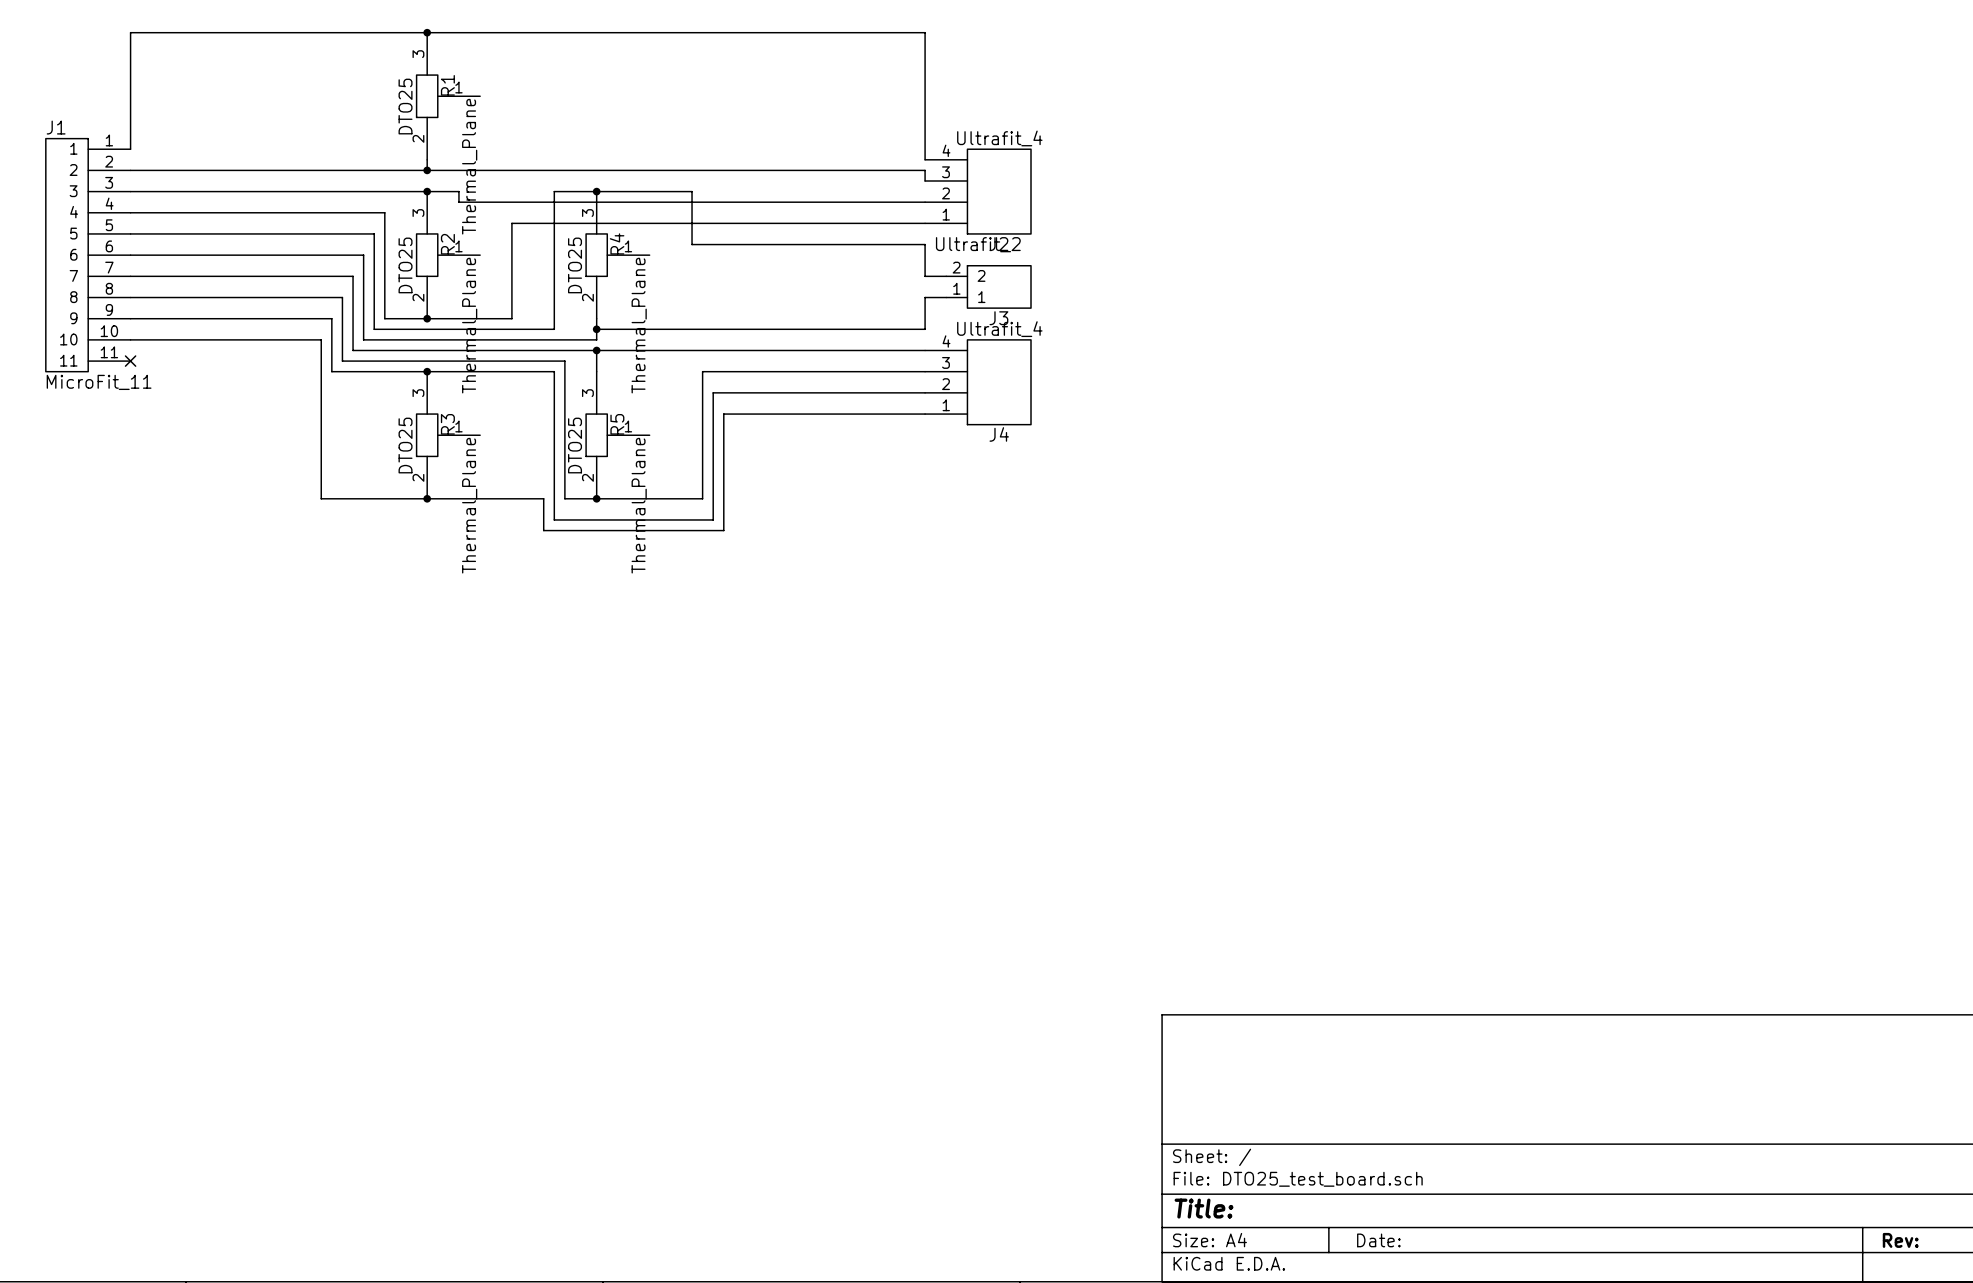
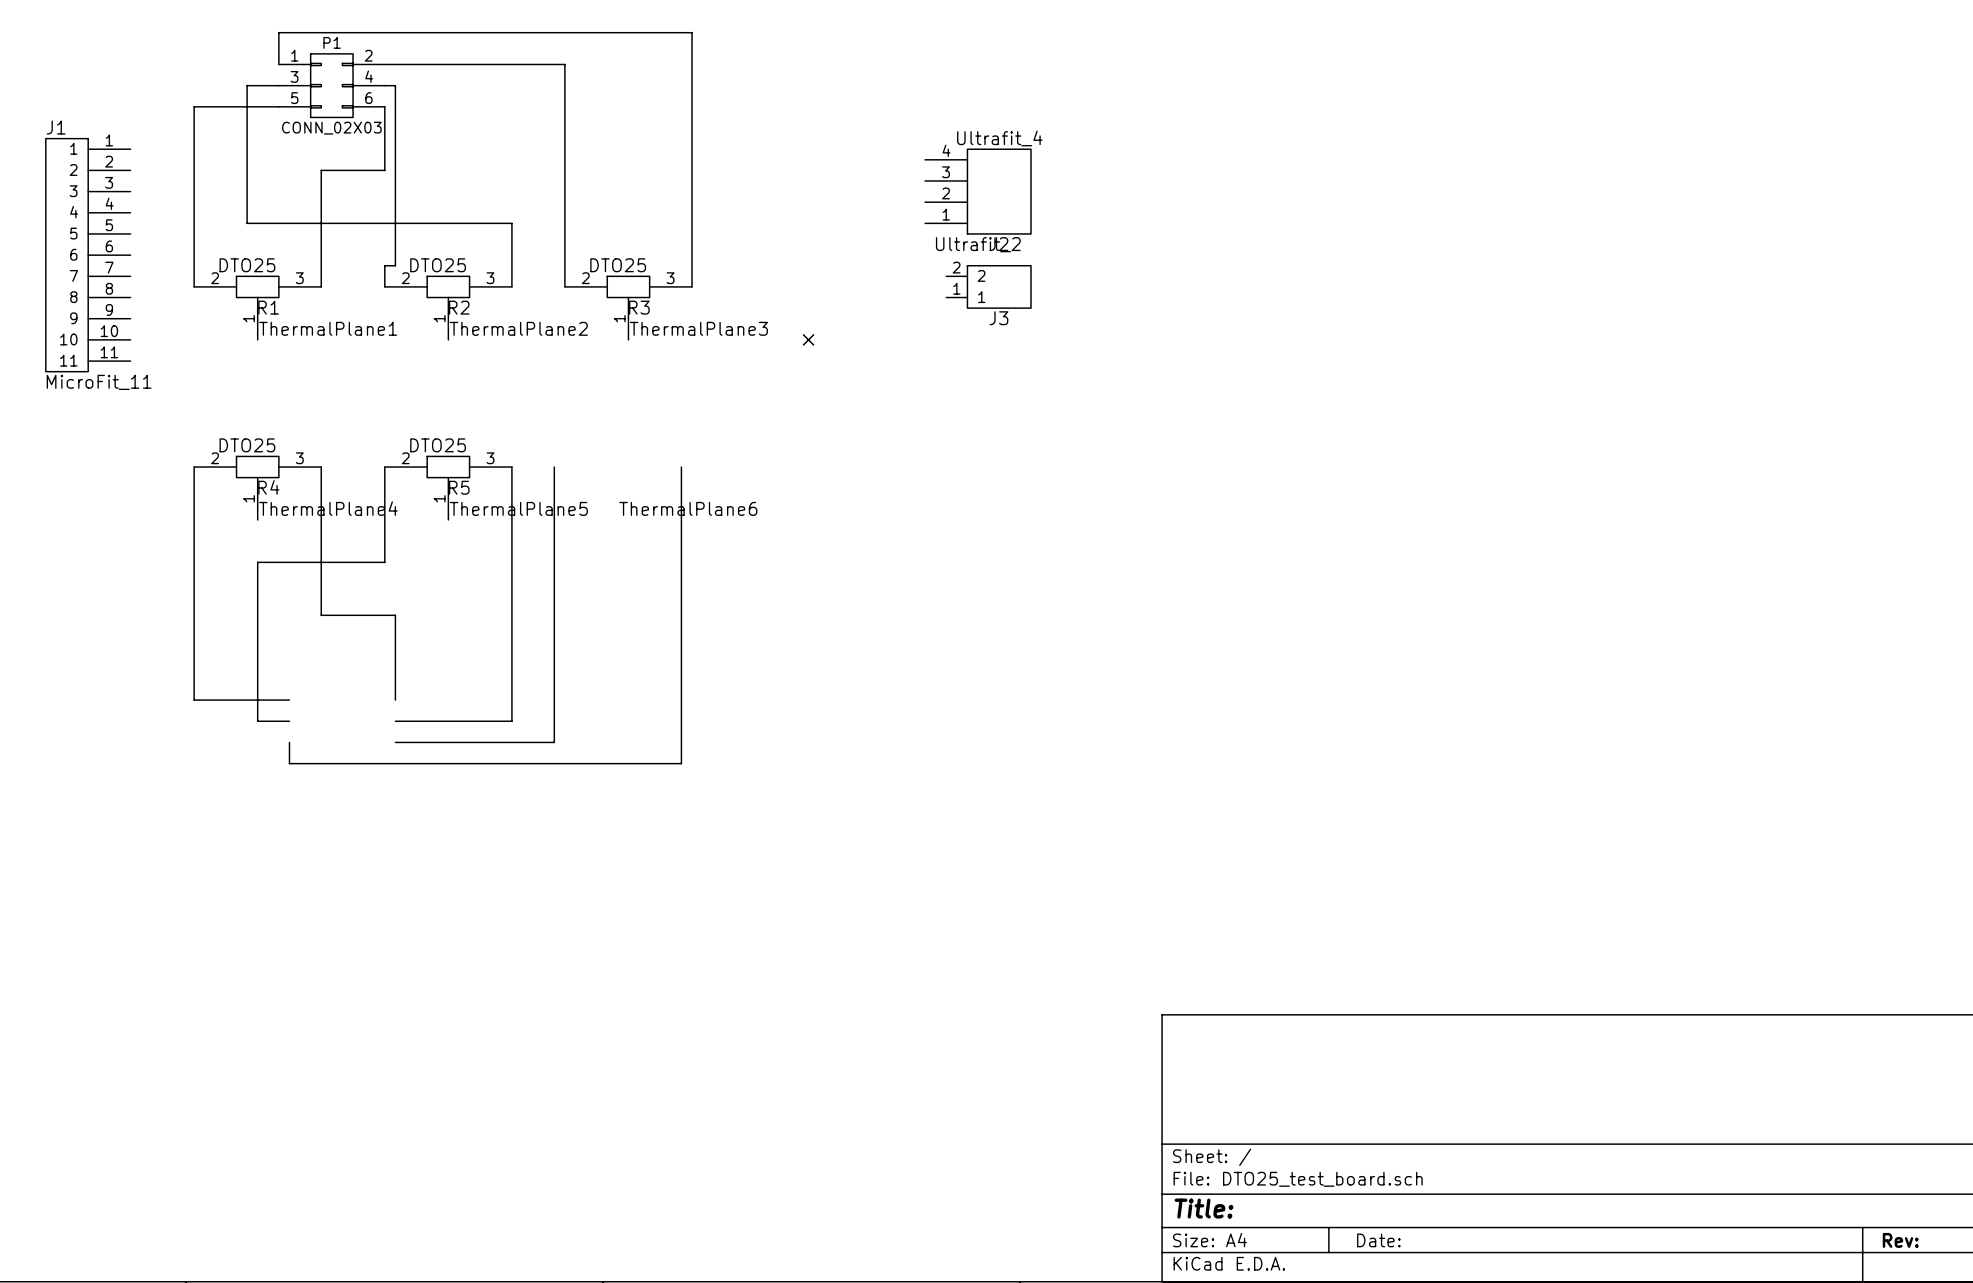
wire: (278, 32) (130, 32) (130, 149) -> (278, 32) (278, 64)
junction: (427, 32) -> none
wire: (692, 32) (925, 32) (925, 159) -> (692, 32) (692, 191)
wire: none -> (384, 64) (564, 64) (564, 286)
P1: none -> CONN_02X03 (331, 85)
R1 rotation: 0° (427, 96) -> 90° clockwise (257, 286)
R1 position: (448, 96) -> (257, 308)
wire: none -> (278, 106) (194, 106) (194, 286)
wire: (427, 159) (427, 170) -> none
label: Thermal_Plane (469, 166) -> none
wire: (130, 170) (321, 170) -> (321, 286) (321, 170)
wire: (384, 170) (925, 170) (925, 181) -> (384, 170) (384, 106)
junction: (427, 170) -> none
wire: (130, 191) (458, 191) (458, 202) (925, 202) -> none
junction: (427, 191) -> none
junction: (596, 191) -> none
wire: (692, 191) (554, 191) (554, 329) (374, 329) (374, 233) (130, 233) -> none
wire: (130, 212) (384, 212) (384, 265) -> (384, 85) (395, 85) (395, 265) (384, 265)
wire: (511, 223) (925, 223) -> (511, 223) (247, 223) (247, 85) (278, 85)
wire: (692, 244) (925, 244) (925, 276) (946, 276) -> (692, 244) (692, 286)
wire: (130, 255) (363, 255) (363, 339) (596, 339) (596, 318) -> none
R2 rotation: 0° (427, 255) -> 90° clockwise (448, 286)
R4 rotation: 0° (596, 255) -> 90° clockwise (257, 467)
R4 position: (617, 255) -> (257, 488)
wire: (130, 276) (353, 276) (353, 350) (925, 350) -> none
wire: (384, 286) (384, 318) (511, 318) (511, 286) -> none
wire: (130, 297) (342, 297) (342, 361) (564, 361) (564, 498) (702, 498) (702, 371) (925, 371) -> none
wire: (946, 297) (925, 297) (925, 329) (596, 329) -> none
wire: (130, 318) (331, 318) (331, 371) (554, 371) (554, 467) -> none
junction: (427, 318) -> none
label: Thermal_Plane (469, 325) -> ThermalPlane2 (518, 328)
label: Thermal_Plane (639, 325) -> ThermalPlane3 (698, 328)
label: none -> ThermalPlane1 (328, 328)
junction: (596, 329) -> none
wire: (130, 339) (321, 339) (321, 467) -> none
no-connect mark: none -> (808, 339)
wire: (596, 350) (596, 371) -> none
junction: (596, 350) -> none
no-connect mark: (130, 361) -> none
junction: (427, 371) -> none
J4: Ultrafit_4 (978, 382) -> none
wire: (925, 392) (713, 392) (713, 519) (554, 519) -> (395, 742) (554, 742) (554, 519)
wire: (925, 414) (723, 414) (723, 530) (543, 530) (543, 498) (321, 498) -> (395, 700) (395, 615) (321, 615) (321, 498)
R3 rotation: 0° (427, 435) -> 90° clockwise (628, 286)
R3 position: (448, 435) -> (628, 308)
R5 rotation: 0° (596, 435) -> 90° clockwise (448, 467)
R5 position: (617, 435) -> (448, 488)
wire: none -> (194, 467) (194, 700) (289, 700)
wire: none -> (384, 467) (384, 562) (257, 562) (257, 721) (289, 721)
wire: none -> (511, 467) (511, 721) (395, 721)
wire: none -> (681, 467) (681, 763) (289, 763) (289, 742)
junction: (427, 498) -> none
junction: (596, 498) -> none
label: Thermal_Plane (469, 505) -> ThermalPlane5 (518, 508)
label: Thermal_Plane (639, 505) -> ThermalPlane6 (688, 508)
label: none -> ThermalPlane4 (328, 508)

